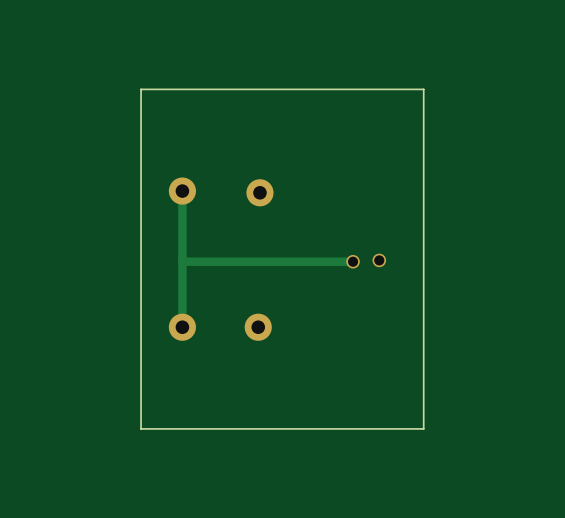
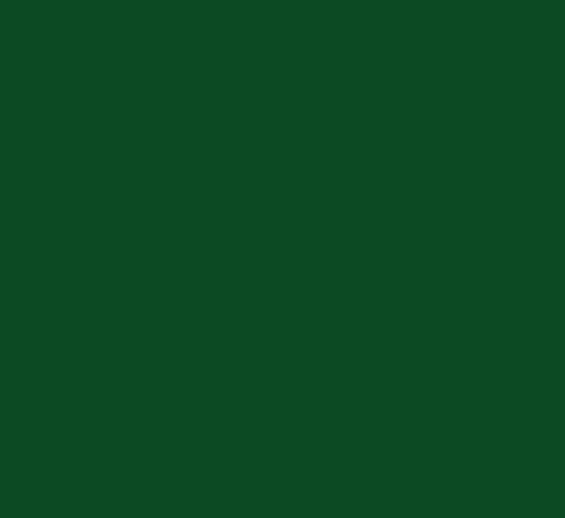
board edge: (423, 89) (141, 89) (141, 428) (423, 428) (423, 89) -> none
track: (182, 191) (182, 325) -> none
via: (182, 191) -> none
via: (259, 192) -> none
track: (182, 260) (184, 261) (353, 261) -> none
via: (379, 260) -> none
via: (353, 261) -> none
via: (182, 327) -> none
via: (258, 327) -> none

